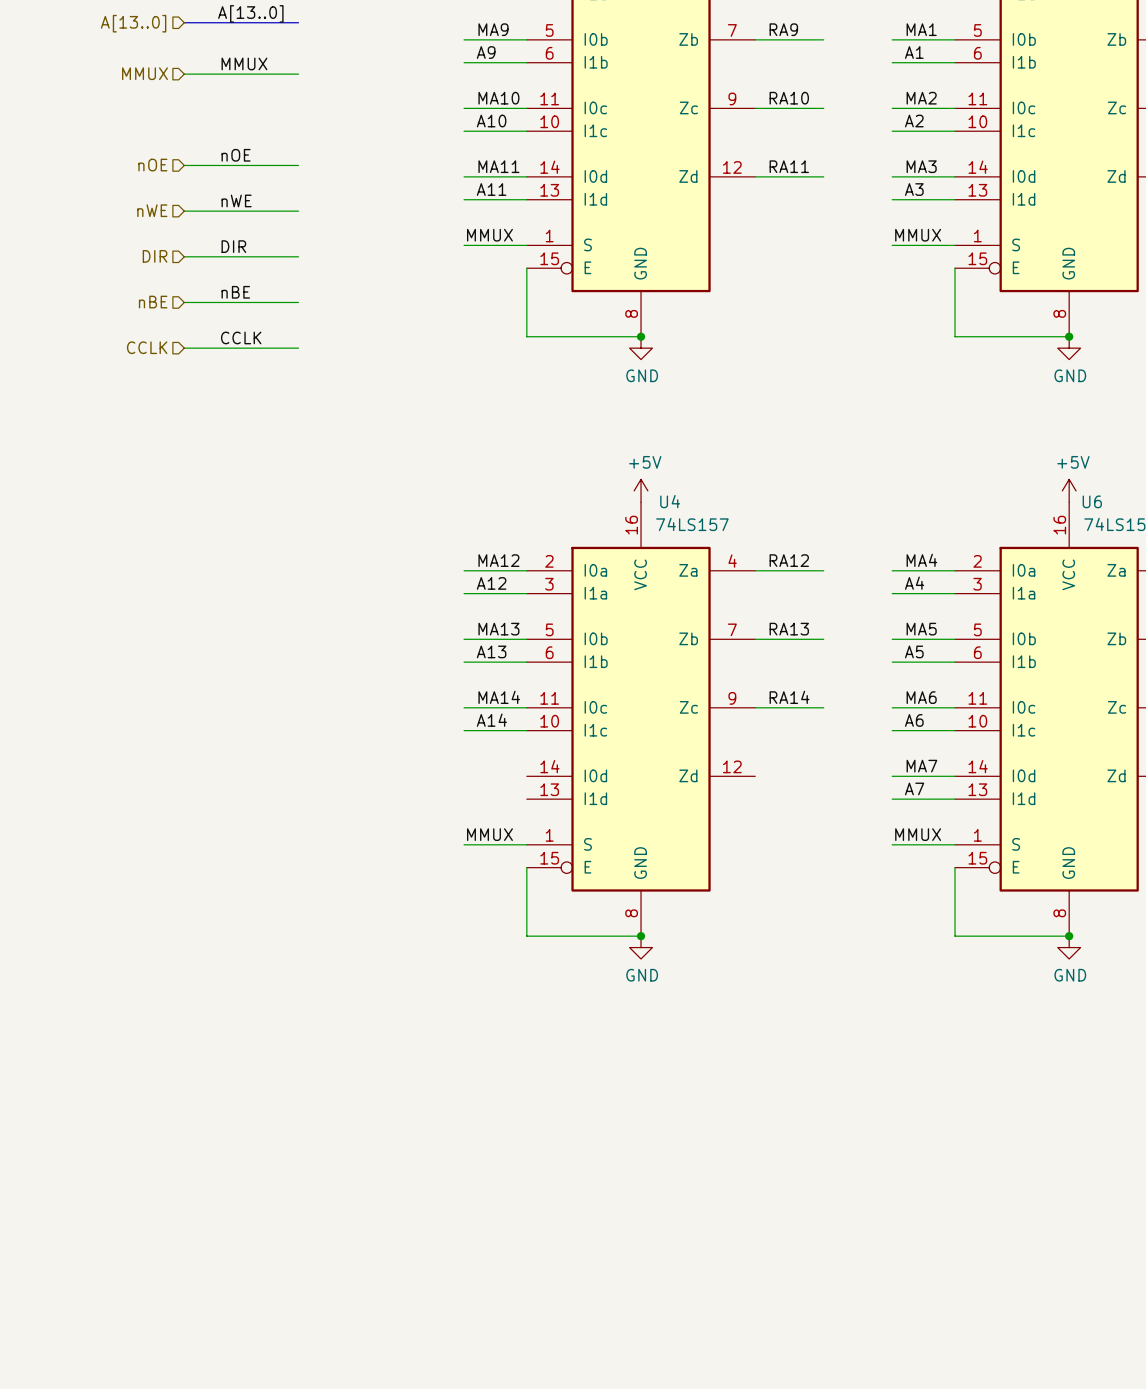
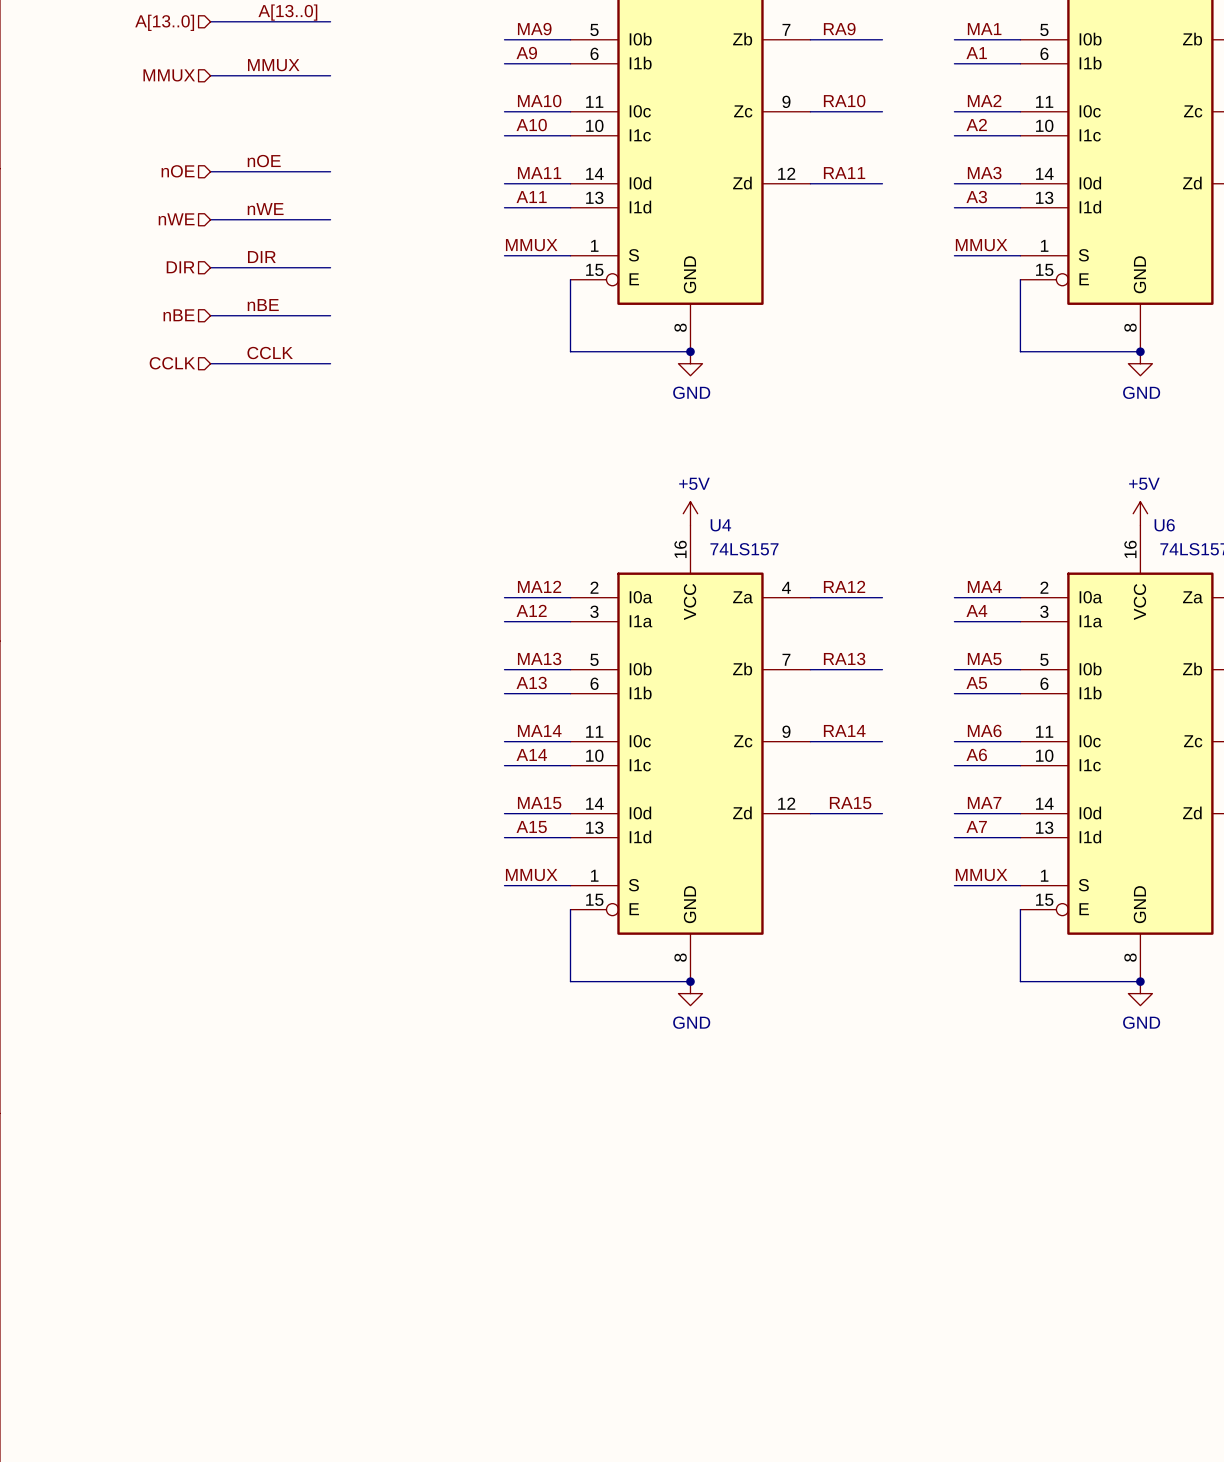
label: none -> MA15 (539, 803)
label: none -> RA15 (850, 803)
wire: none -> (504, 813) (570, 813)
wire: none -> (810, 813) (882, 813)
label: none -> A15 (531, 827)
wire: none -> (504, 837) (570, 837)

